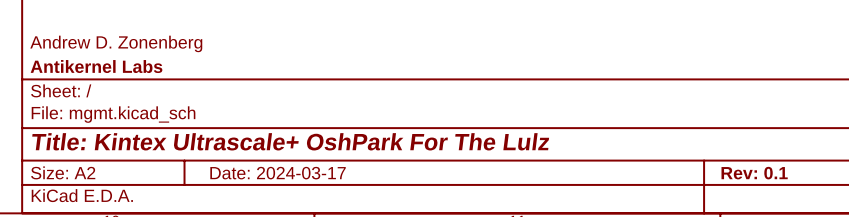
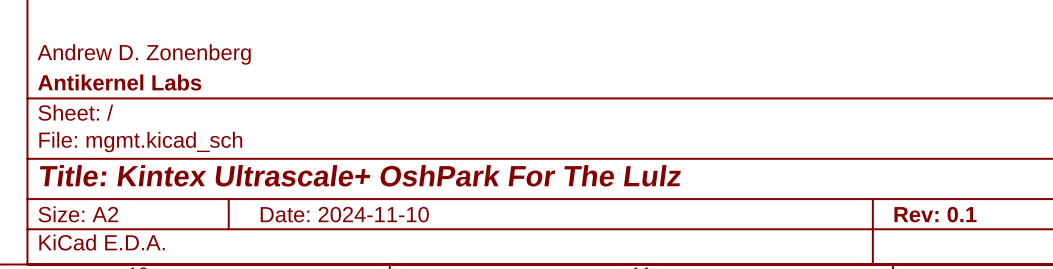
title block: Date: 2024-03-17 (278, 173) -> Date: 2024-11-10 (344, 214)

